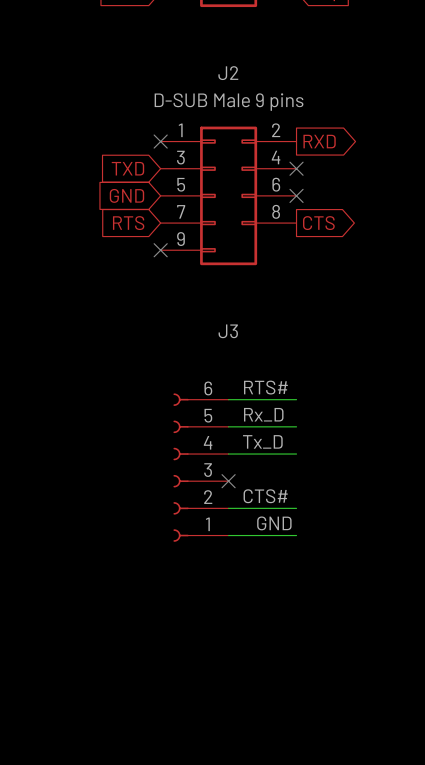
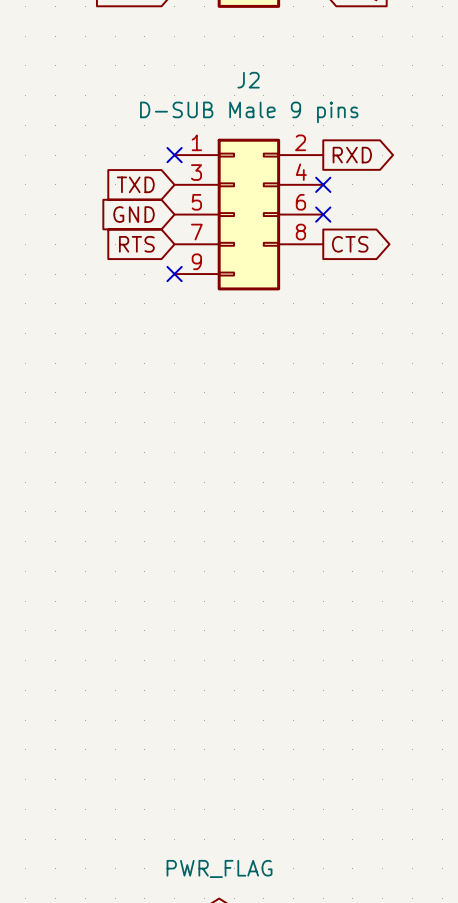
label: RTS# (265, 387) -> none
wire: (228, 399) (296, 399) -> none
label: Rx_D (263, 414) -> none
wire: (228, 426) (296, 426) -> none
label: Tx_D (262, 441) -> none
wire: (228, 454) (296, 454) -> none
J3: (201, 467) -> none
no-connect mark: (228, 481) -> none
label: CTS# (265, 496) -> none
wire: (228, 508) (296, 508) -> none
label: GND (274, 523) -> none
wire: (228, 535) (296, 535) -> none

